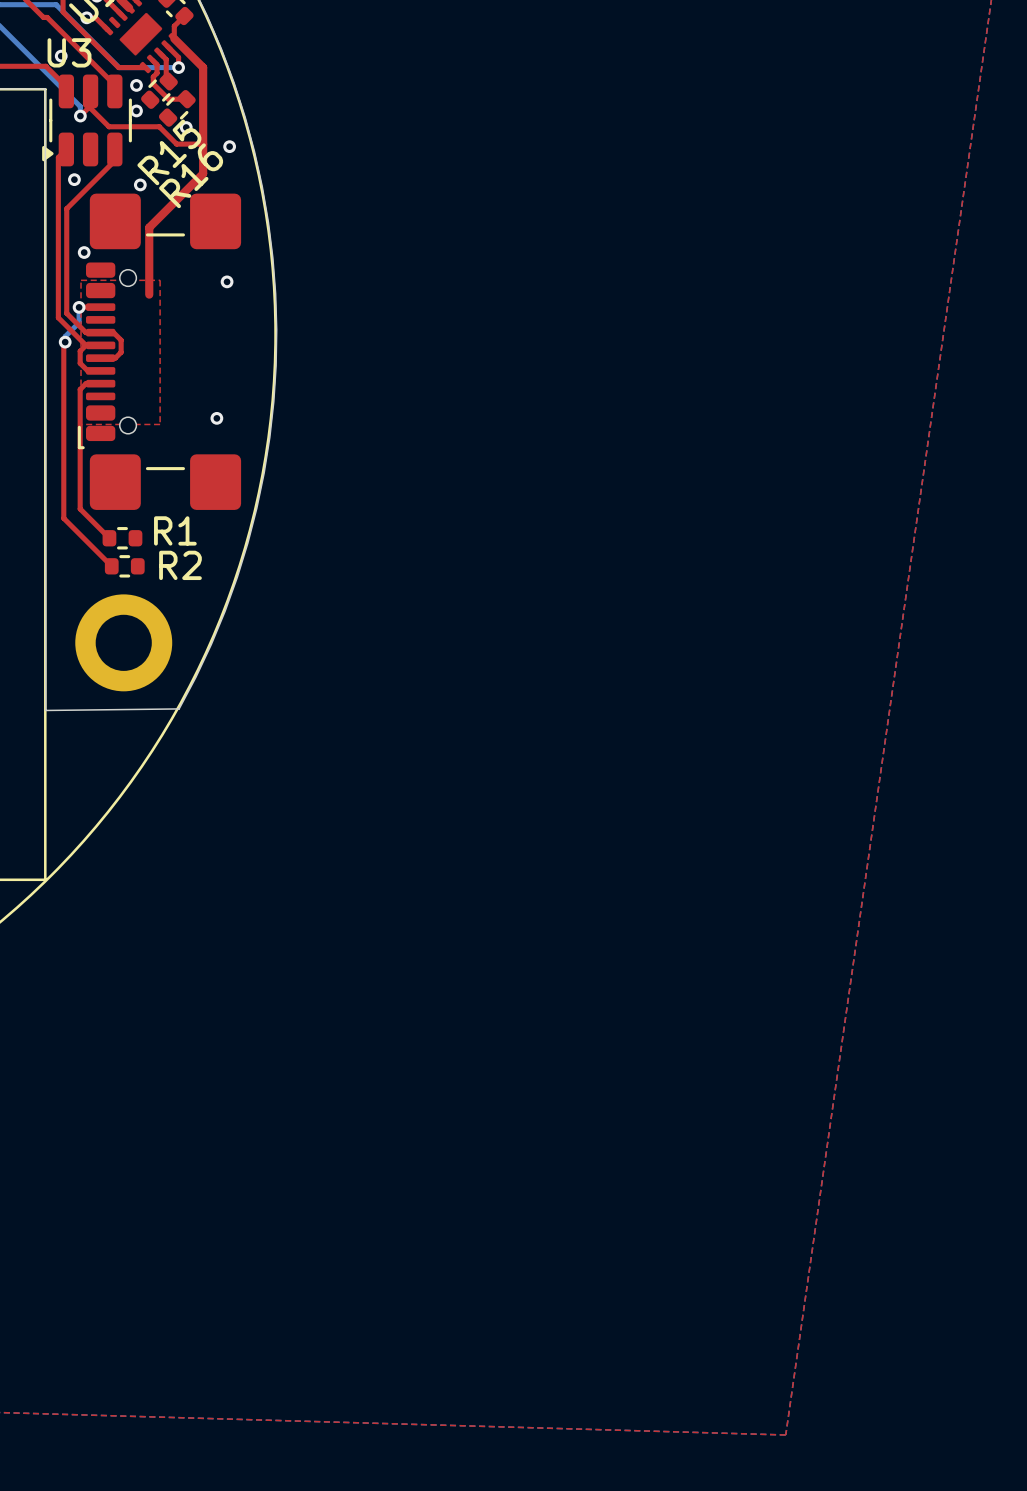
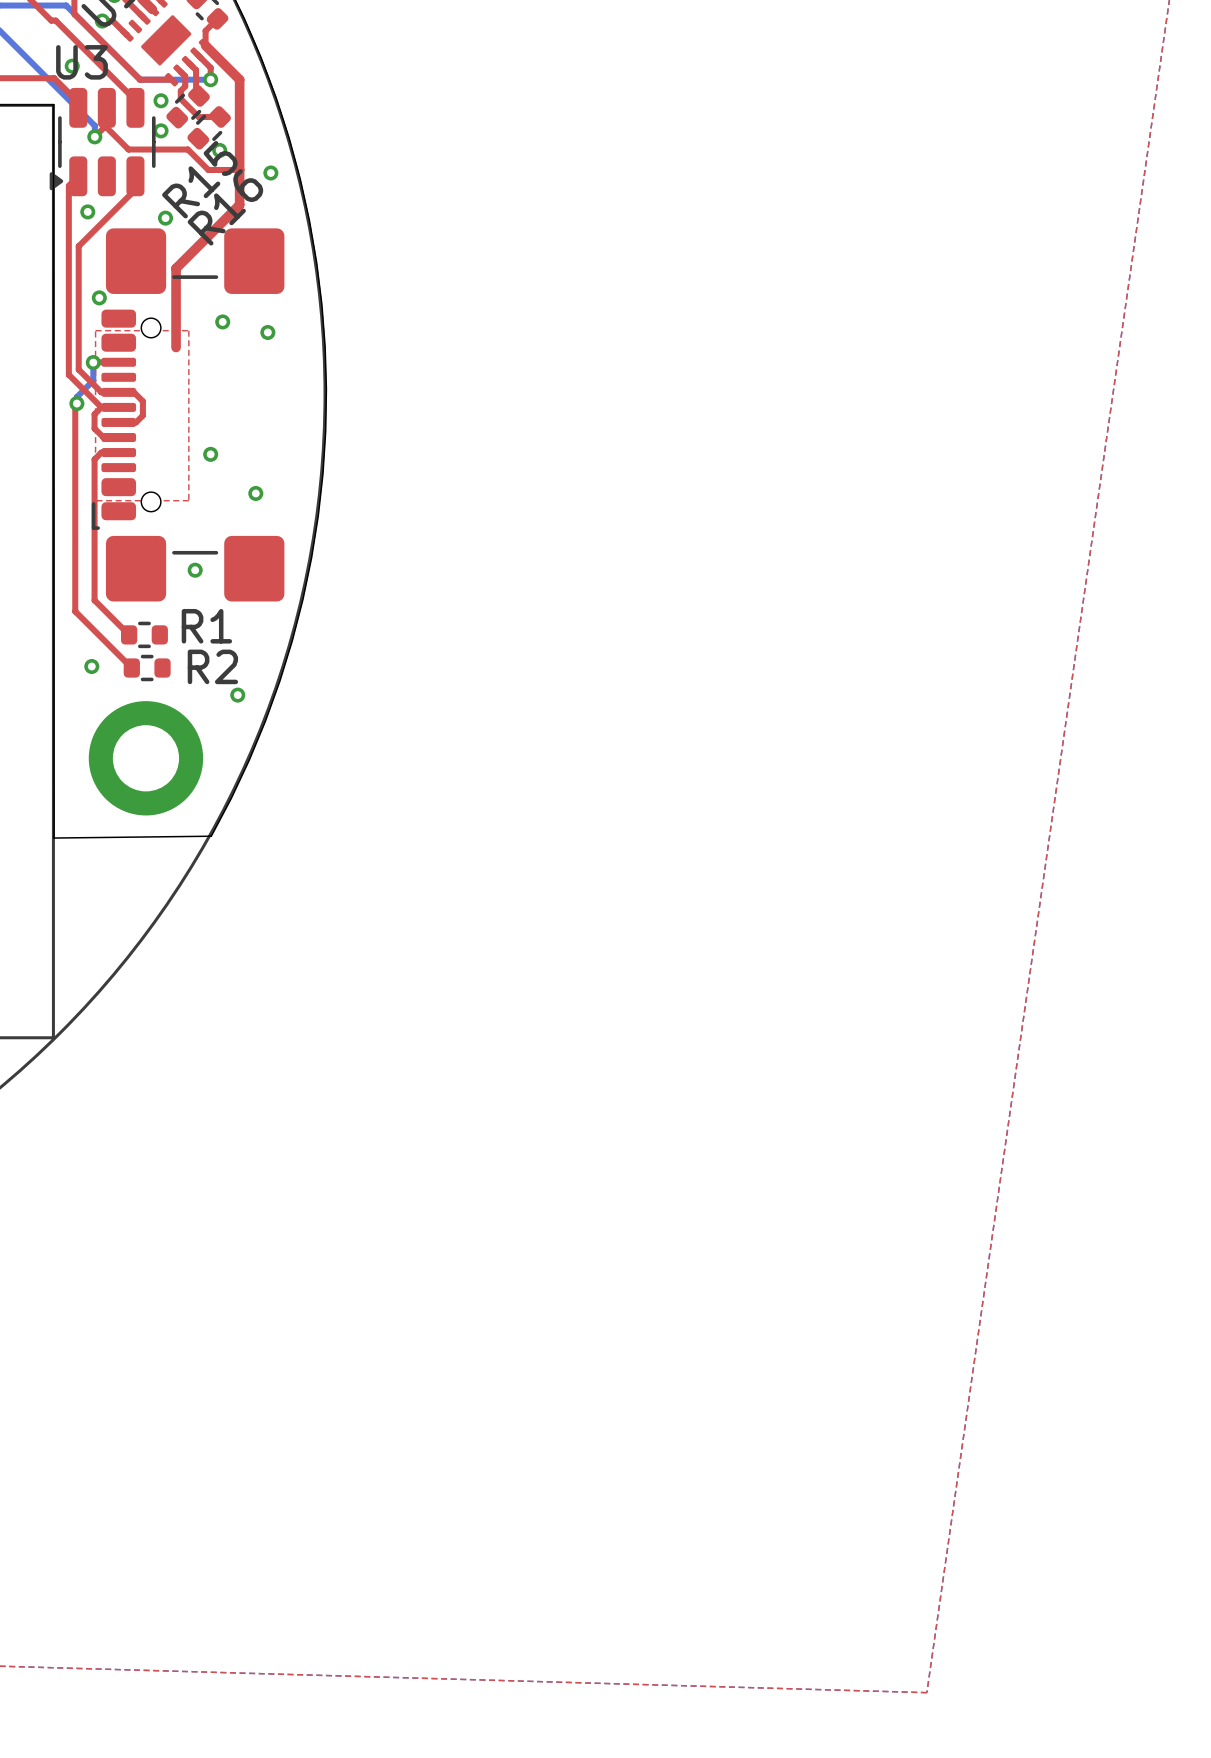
via: none -> (222, 321)
via: none -> (210, 454)
via: none -> (195, 570)
via: none -> (91, 666)
via: none -> (237, 695)

